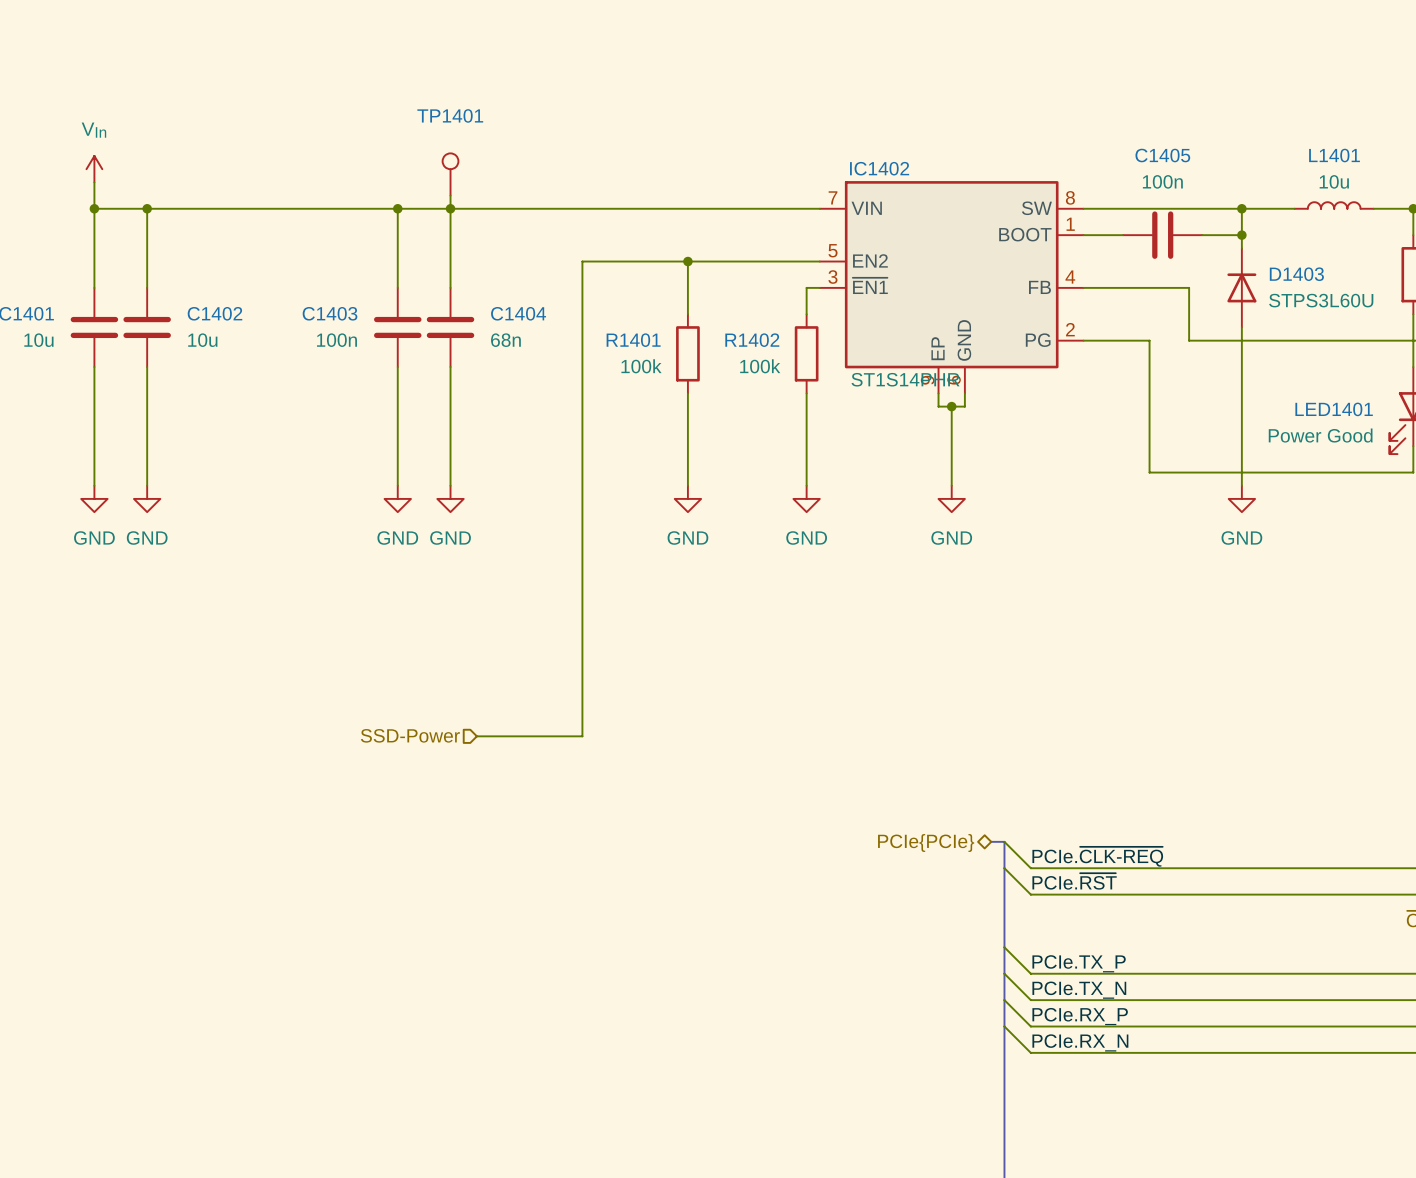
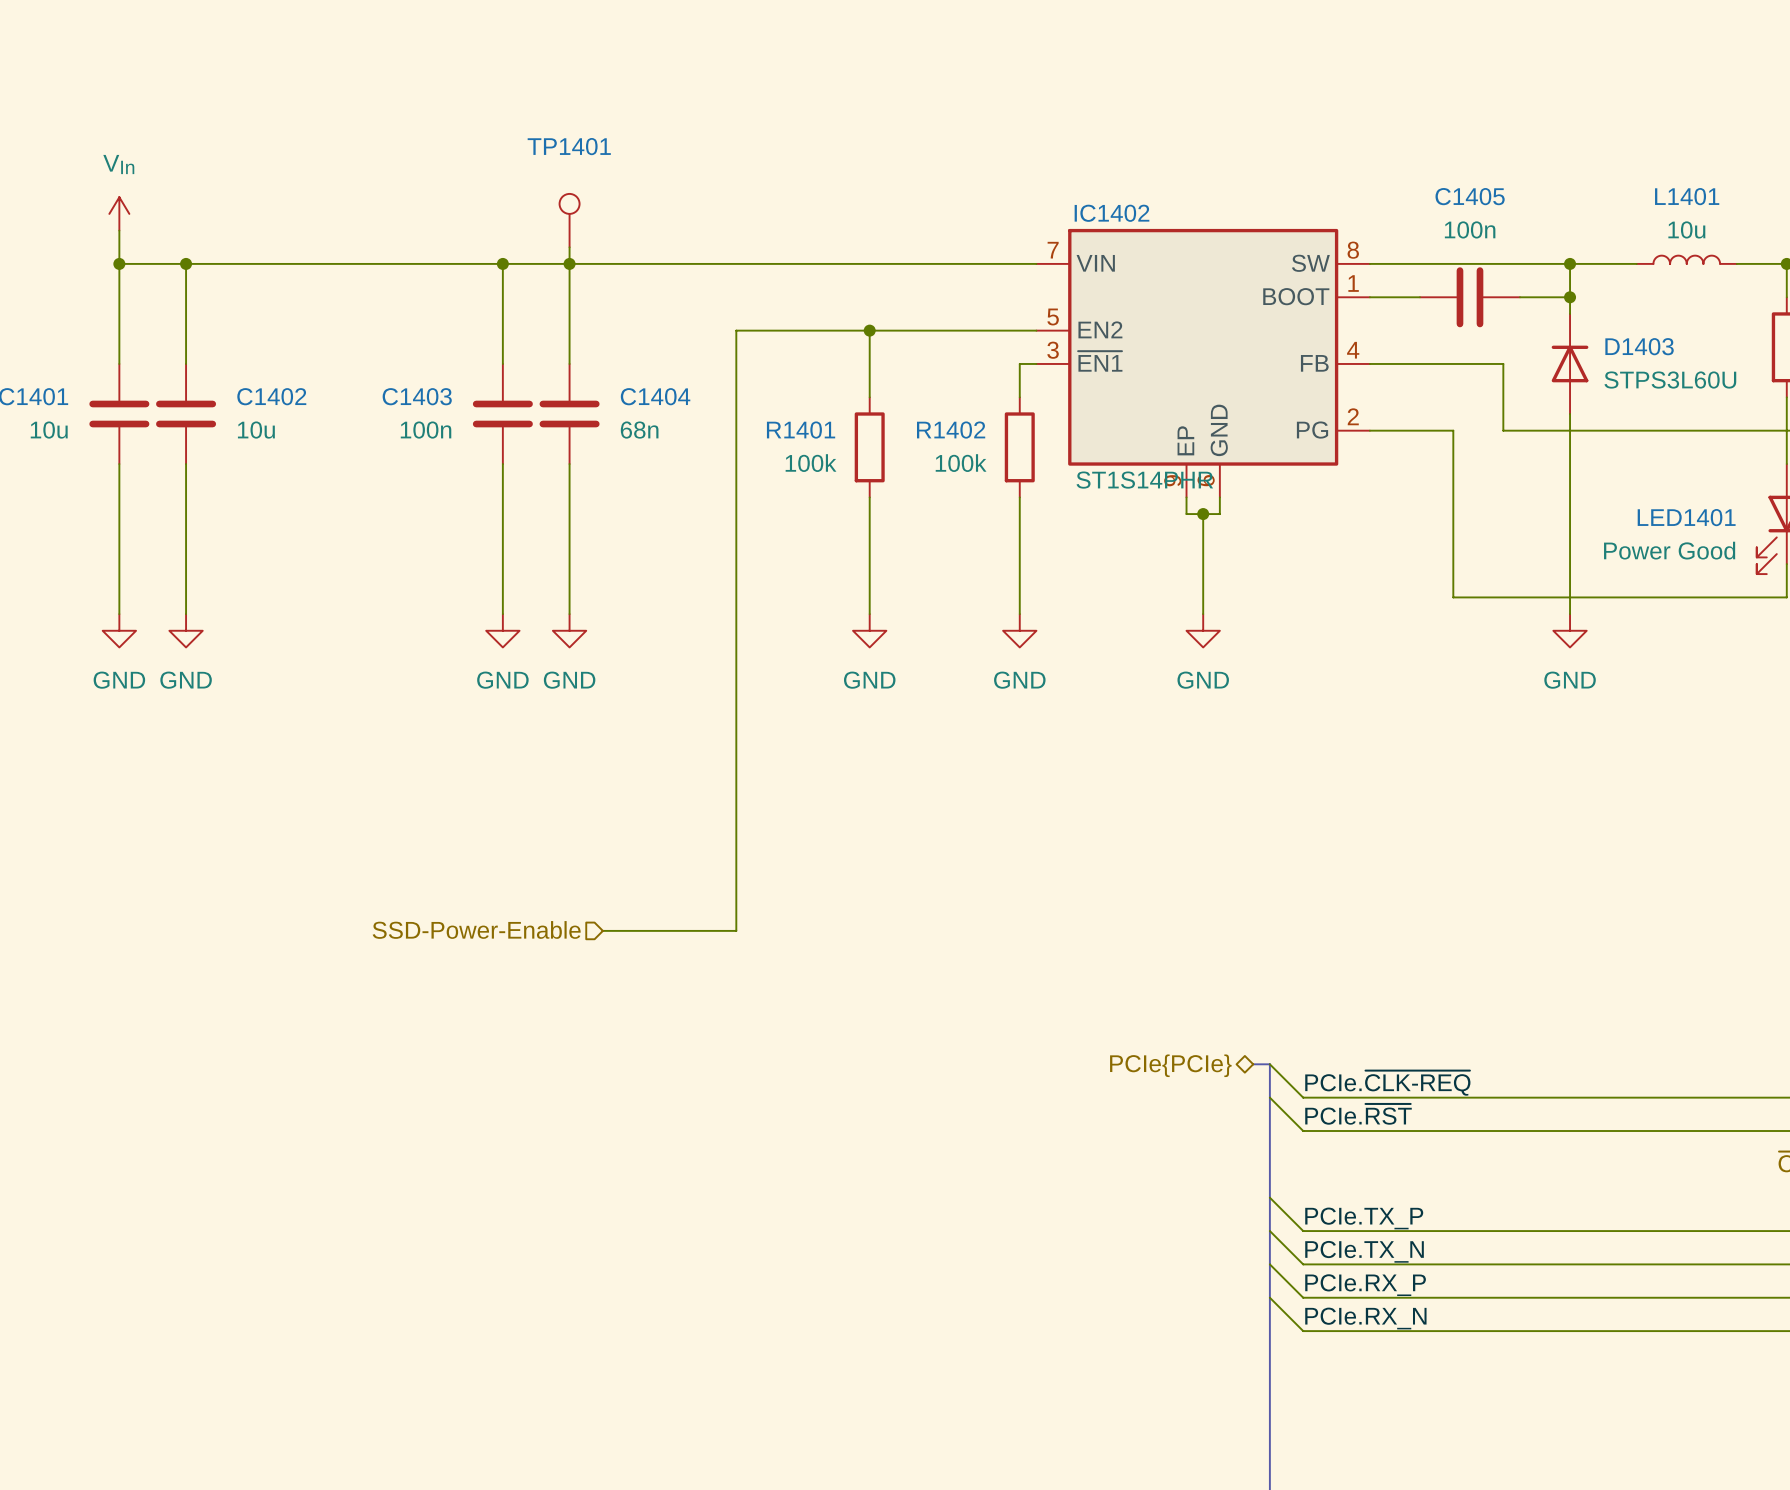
hierarchical label: SSD-Power (410, 735) -> SSD-Power-Enable (476, 929)

